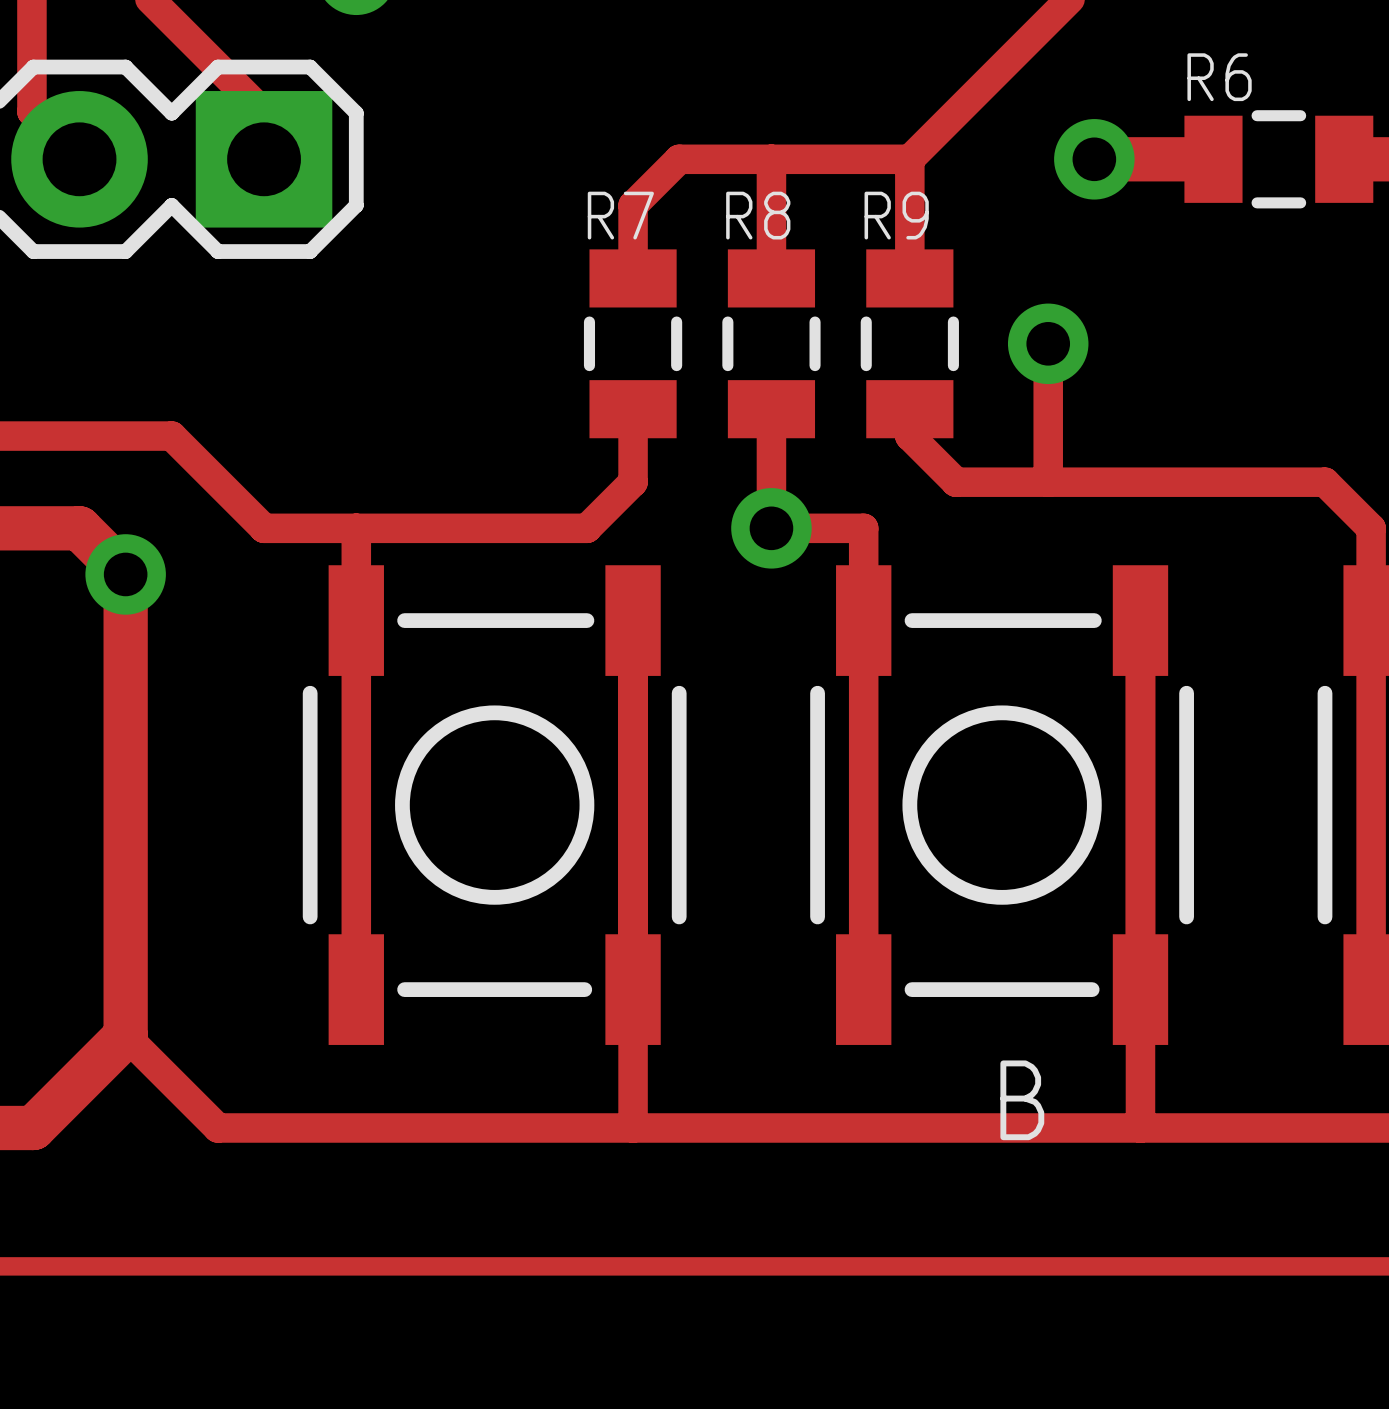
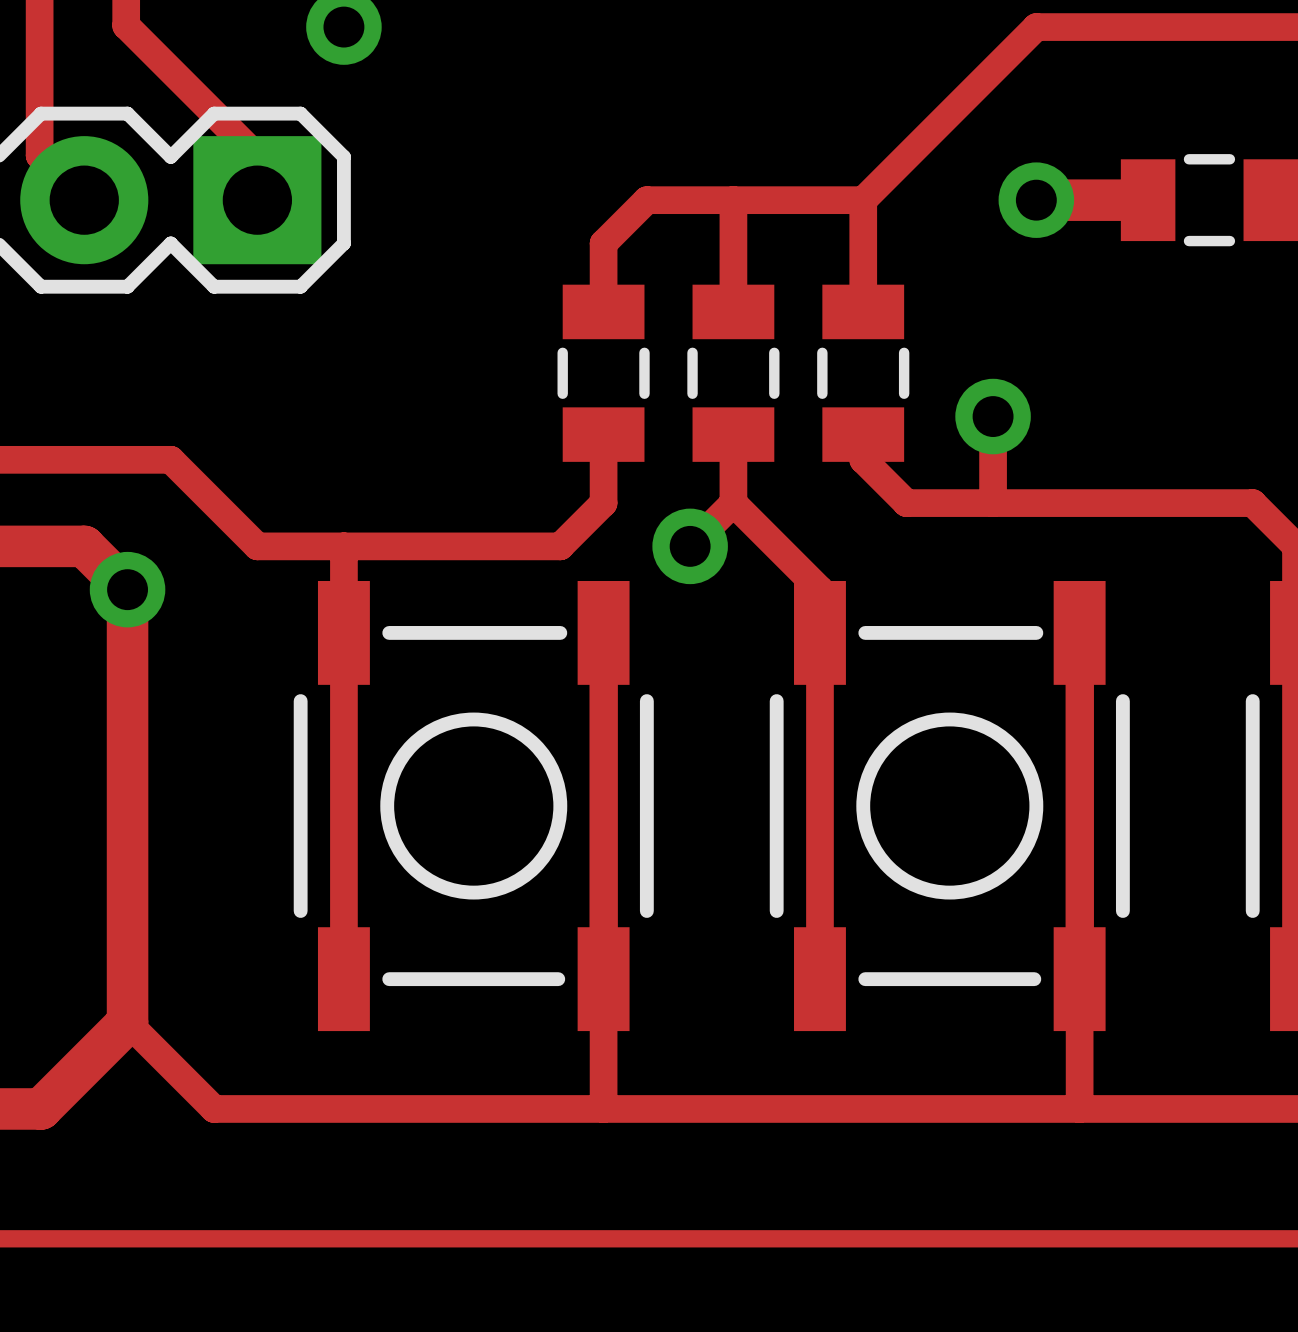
R6 name: R6 (1219, 77) -> none
R7 name: R7 (620, 215) -> none
R8 name: R8 (758, 215) -> none
R9 name: R9 (896, 215) -> none
via position: (1048, 343) -> (993, 416)
track: (771, 482) (771, 528) (863, 528) (863, 574) -> (690, 546) (733, 503) (819, 589)
via position: (771, 528) -> (690, 546)
B name: B (1022, 1100) -> none

